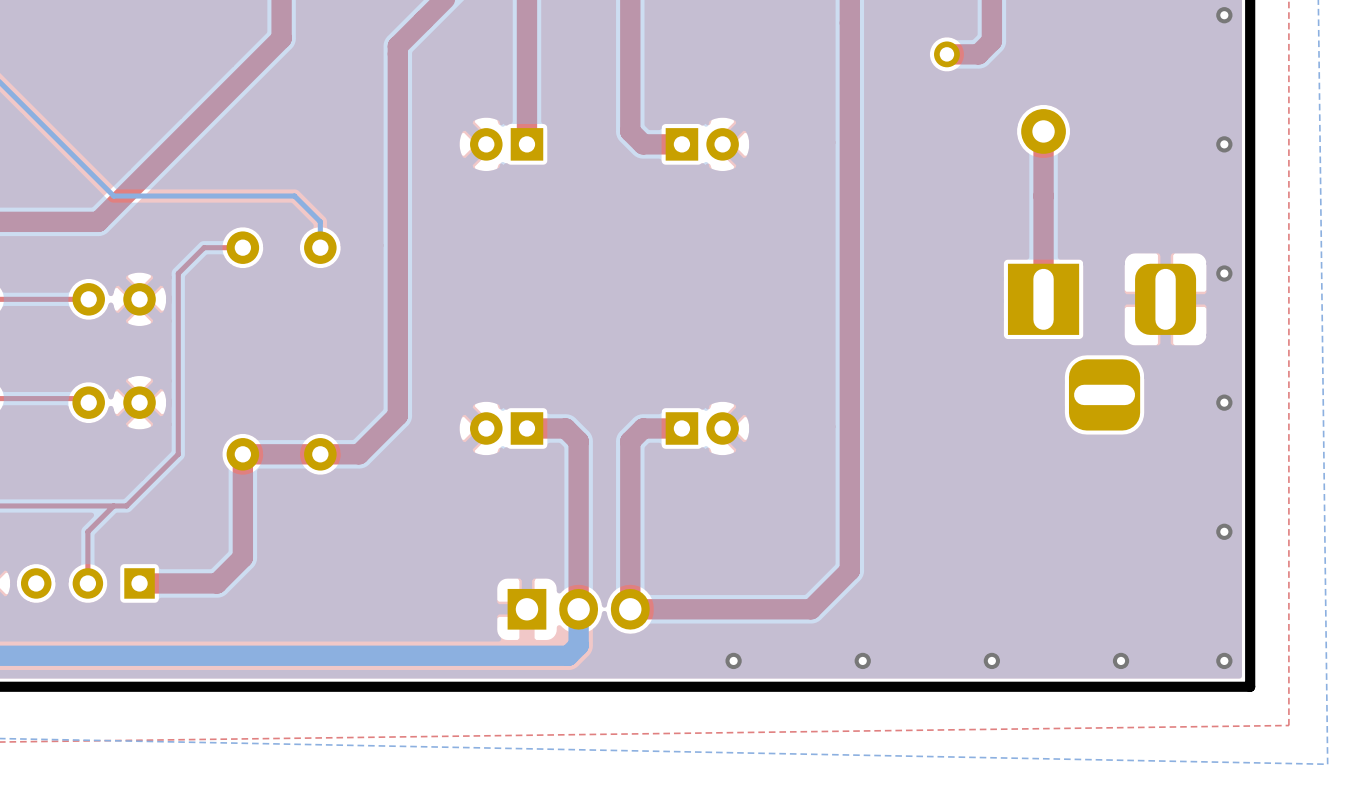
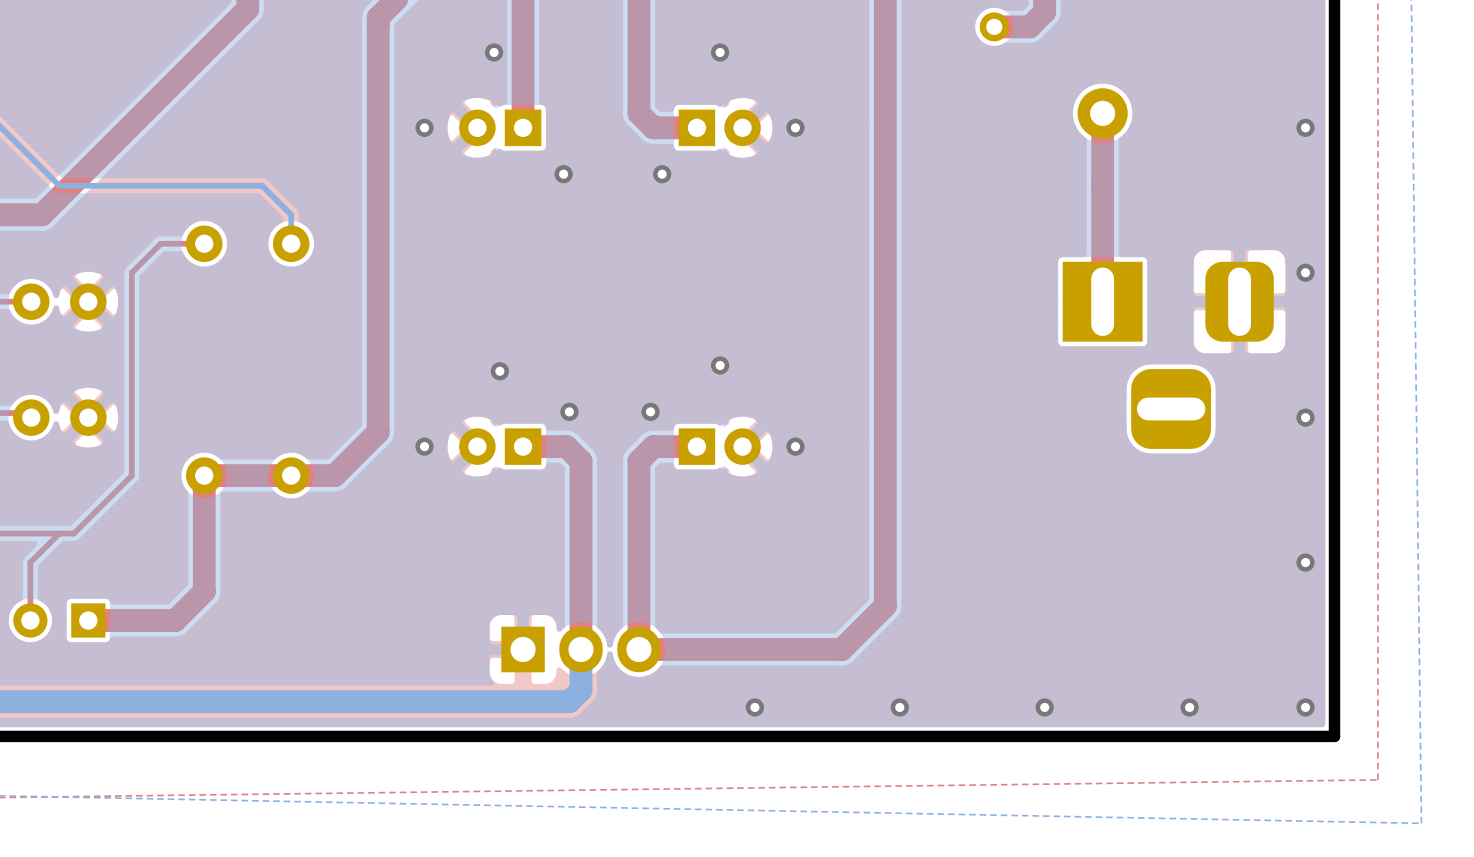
via: none -> (494, 52)
via: none -> (720, 52)
via: none -> (424, 127)
via: none -> (795, 127)
via: none -> (563, 174)
via: none -> (662, 174)
via: none -> (720, 365)
via: none -> (499, 371)
via: none -> (569, 411)
via: none -> (650, 411)
via: none -> (424, 446)
via: none -> (795, 446)

